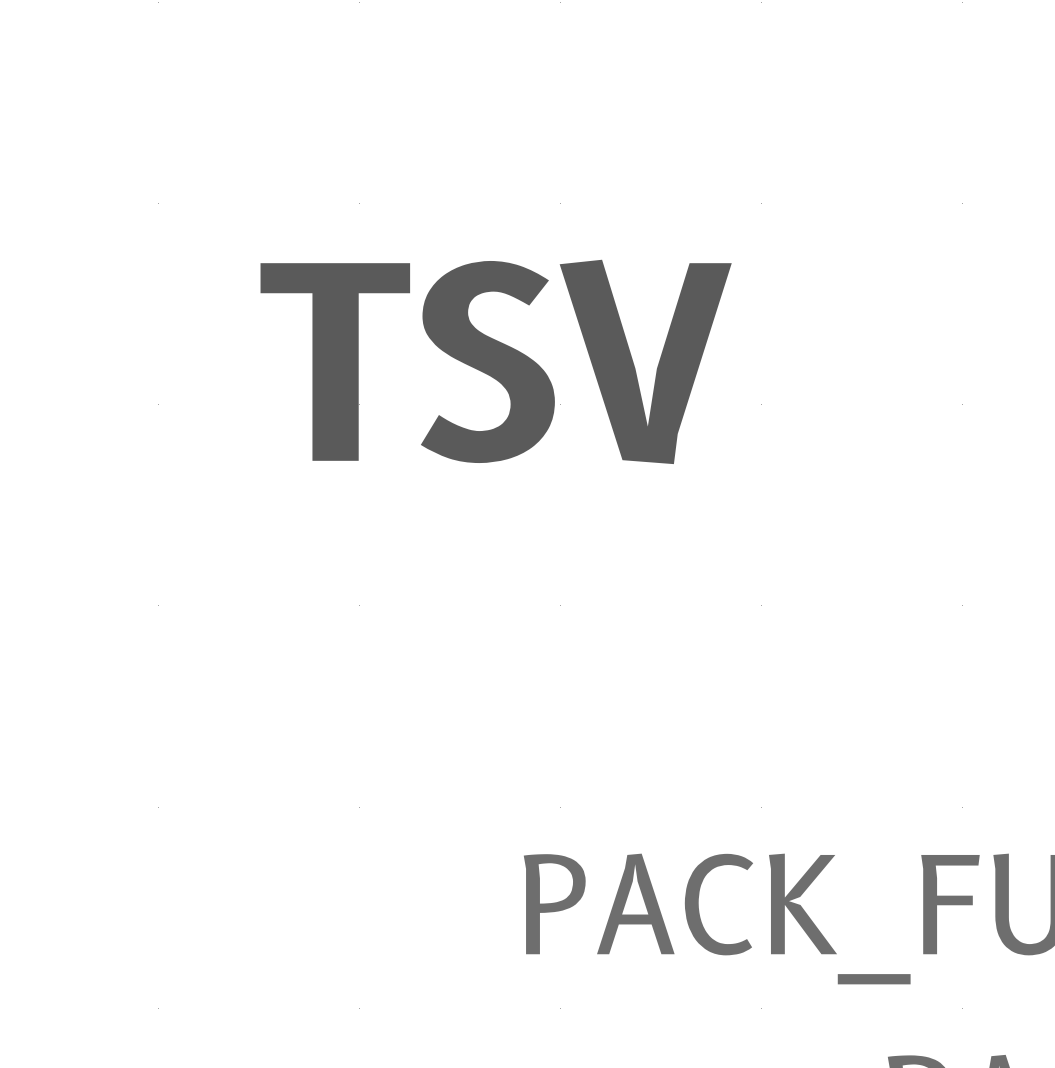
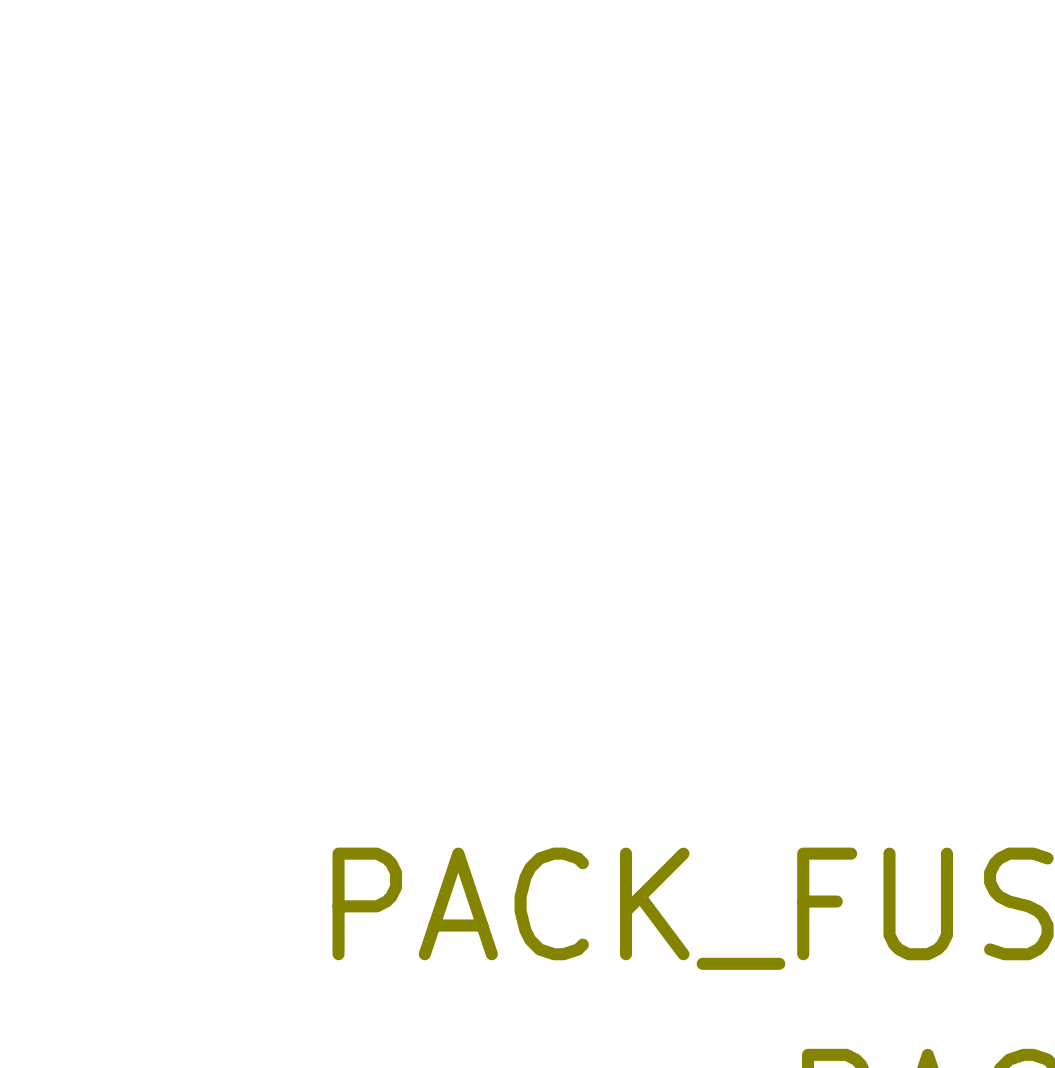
text: TSV (496, 361) -> none

